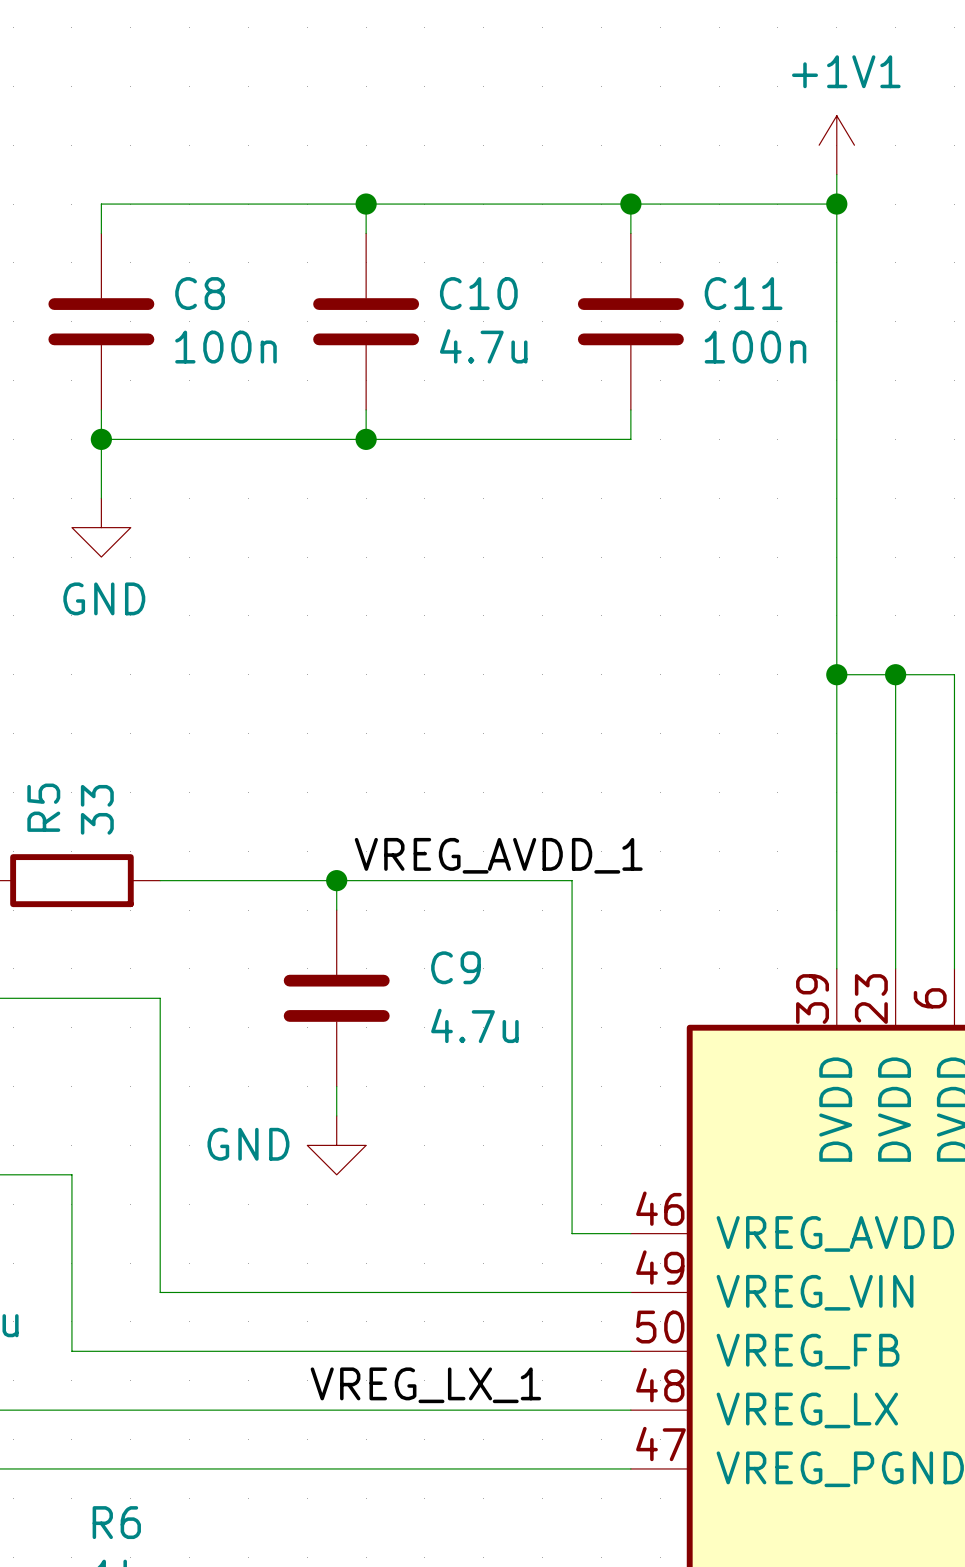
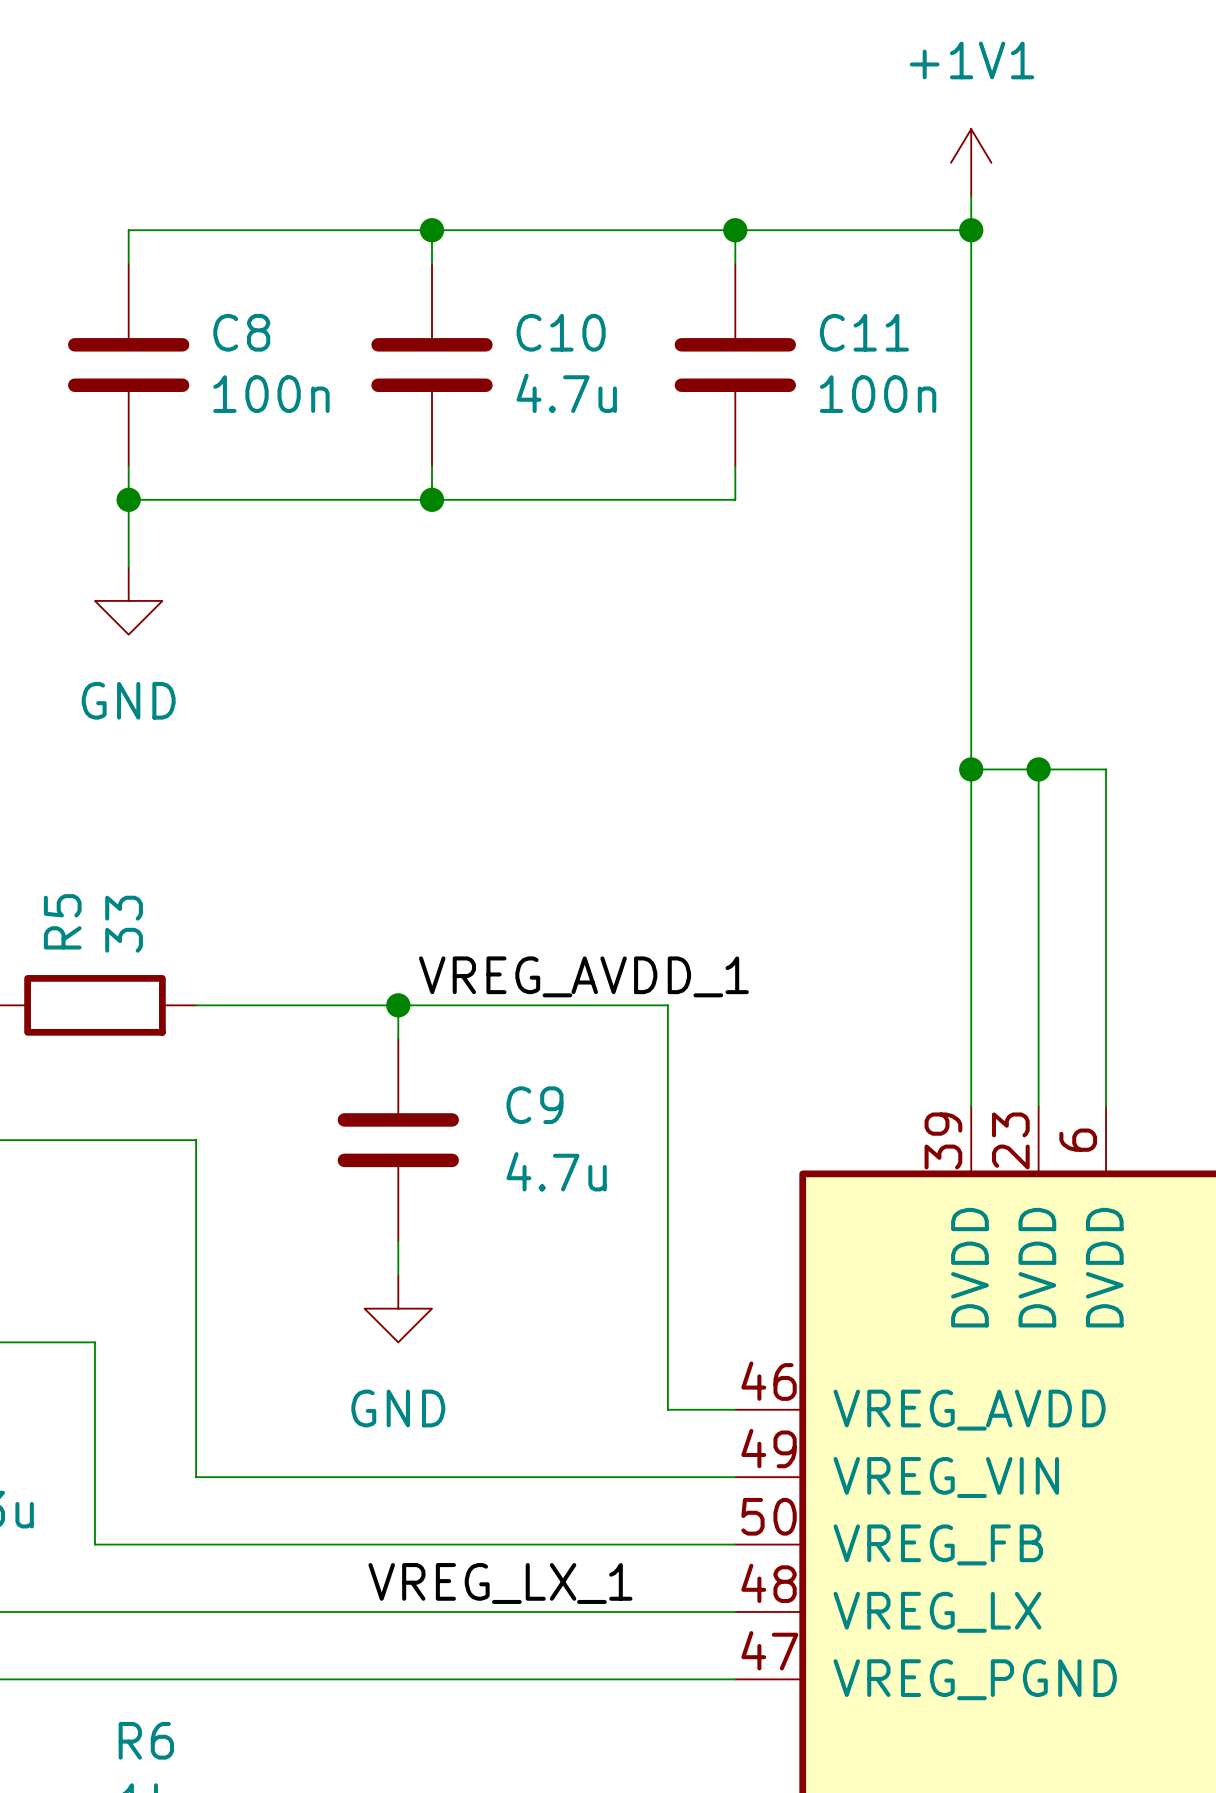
power symbol text position: +1V1 (846, 71) -> +1V1 (972, 60)
power symbol text position: GND (104, 598) -> GND (128, 700)
power symbol text position: GND (248, 1144) -> GND (398, 1408)

